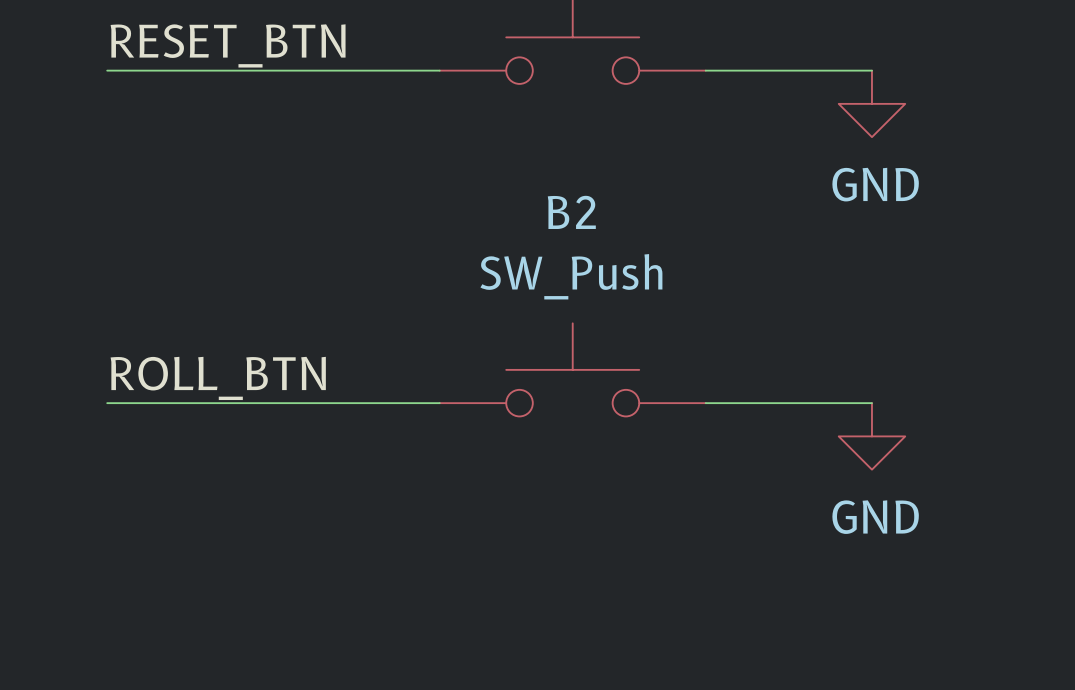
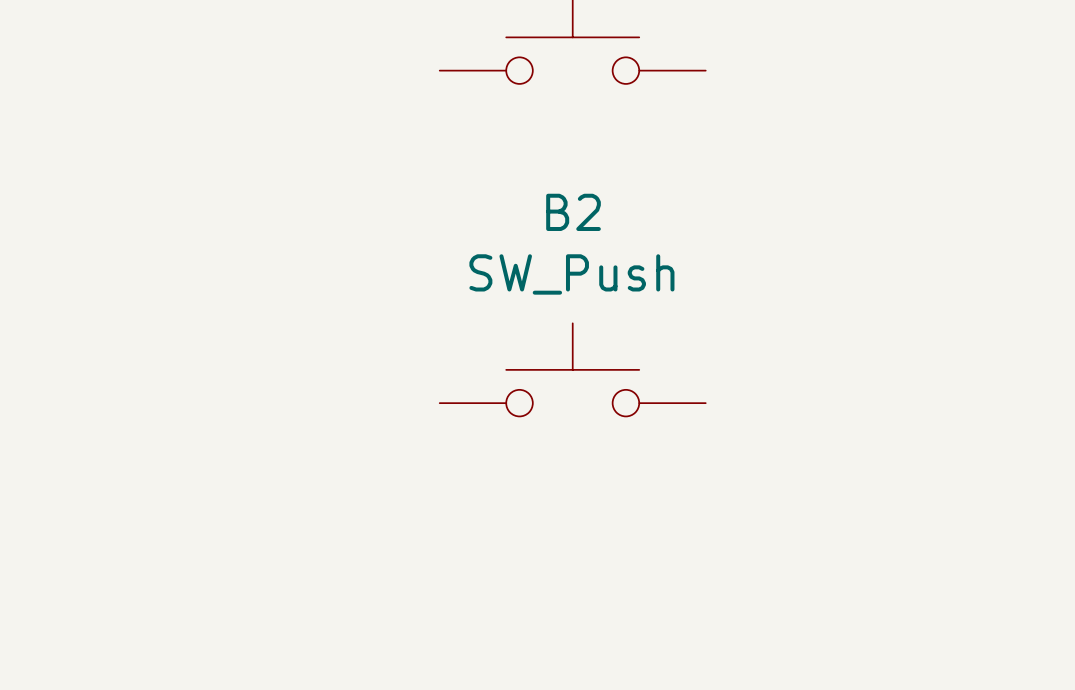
label: RESET_BTN (228, 45) -> none
wire: (107, 70) (439, 70) -> none
wire: (705, 70) (871, 70) -> none
power symbol: GND (871, 103) -> none
label: ROLL_BTN (218, 378) -> none
wire: (107, 403) (439, 403) -> none
wire: (705, 403) (871, 403) -> none
power symbol: GND (871, 436) -> none

